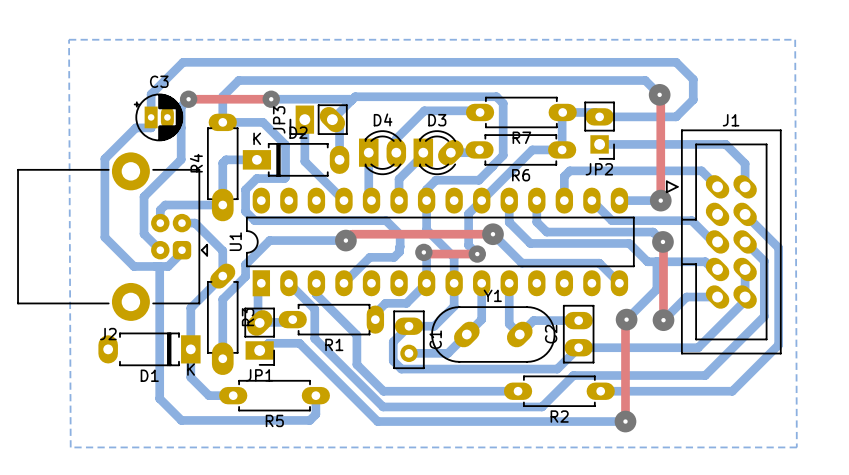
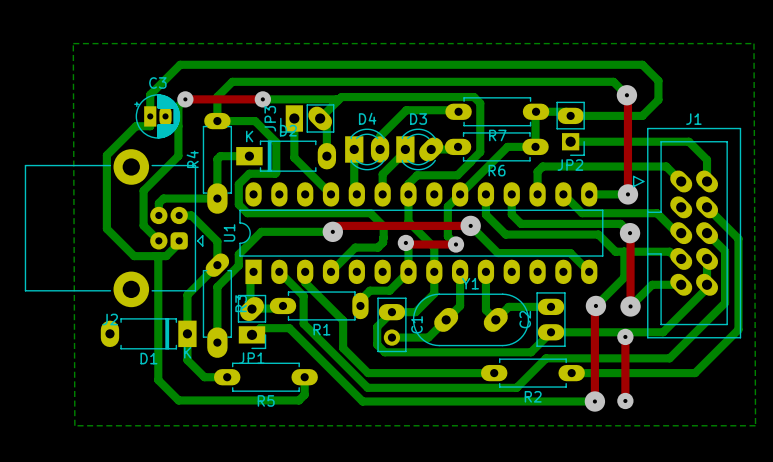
top track: none -> (625, 336) (625, 400)
via: none -> (625, 336)
via: none -> (625, 400)

